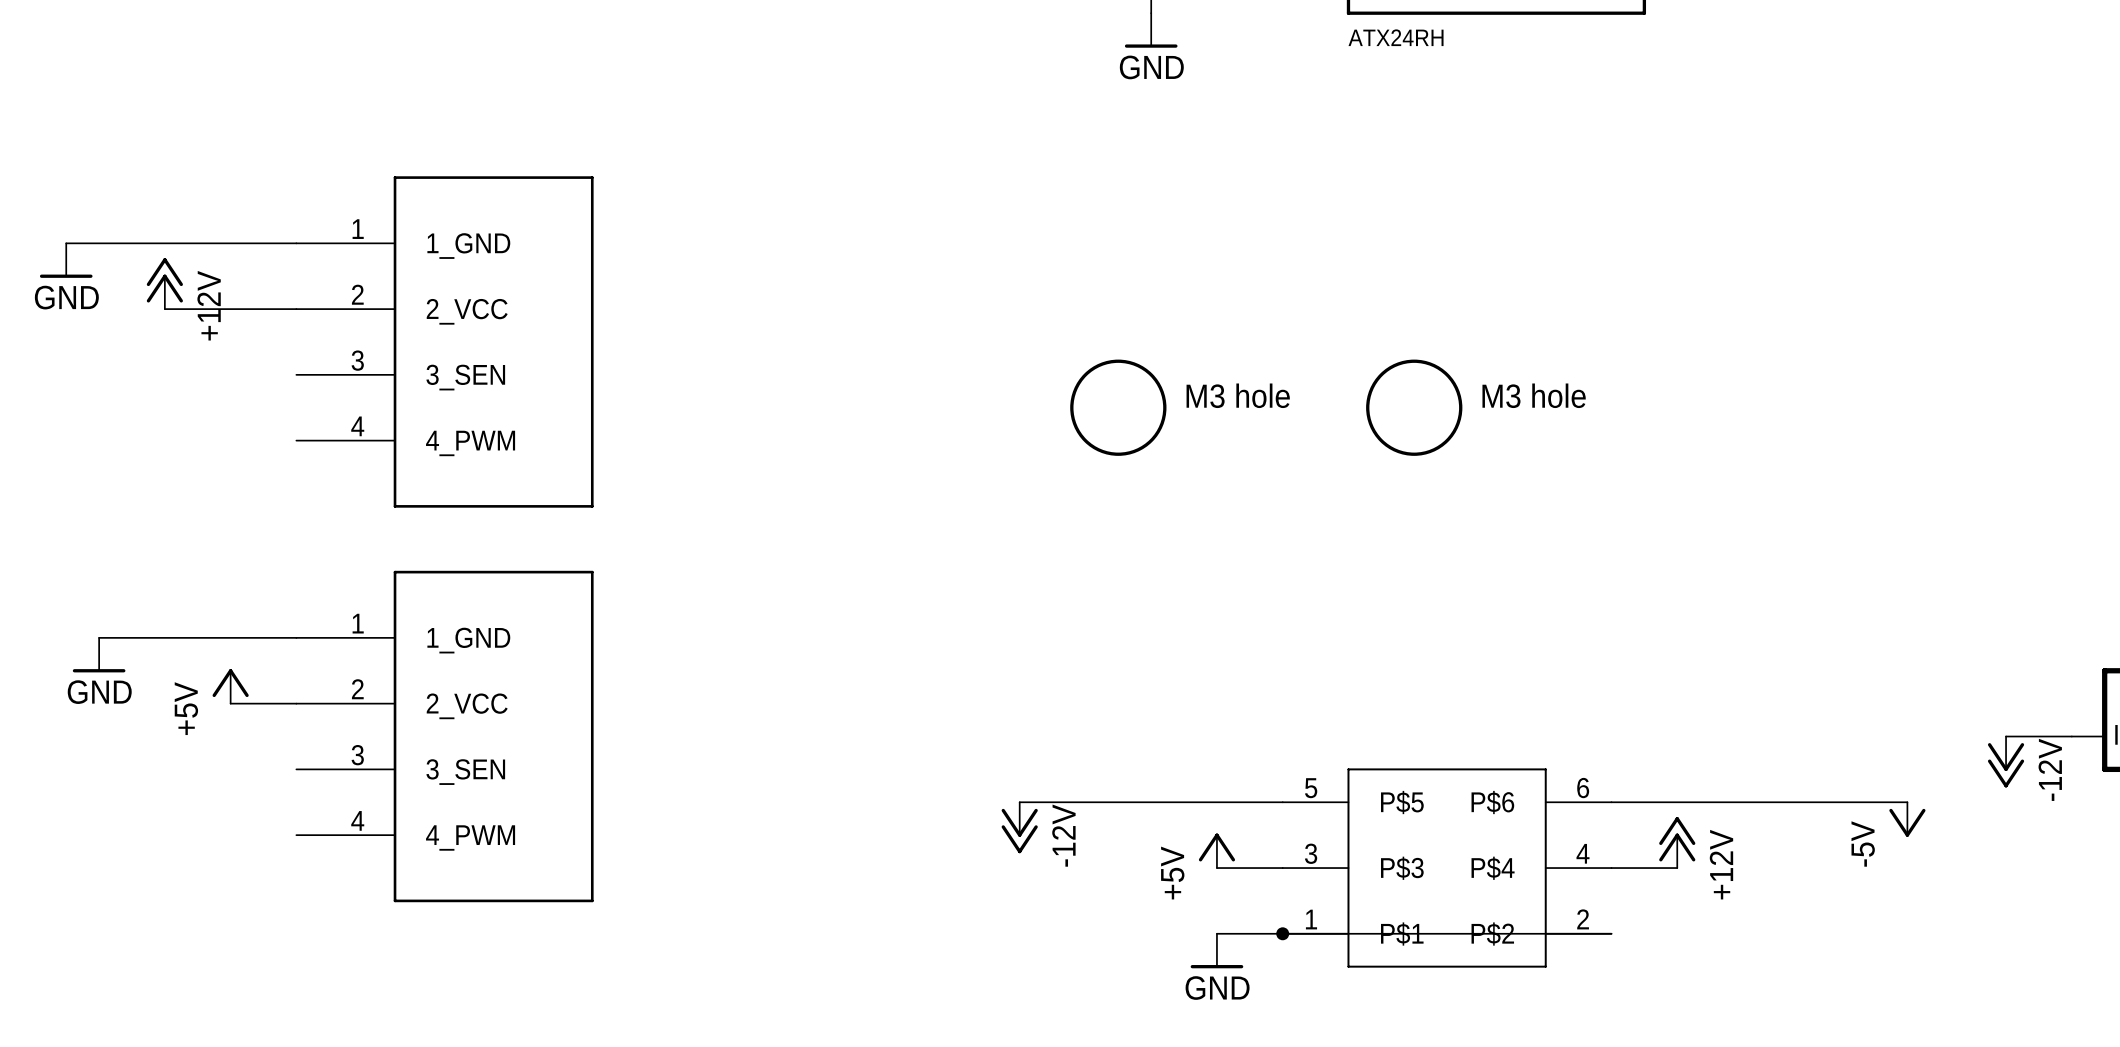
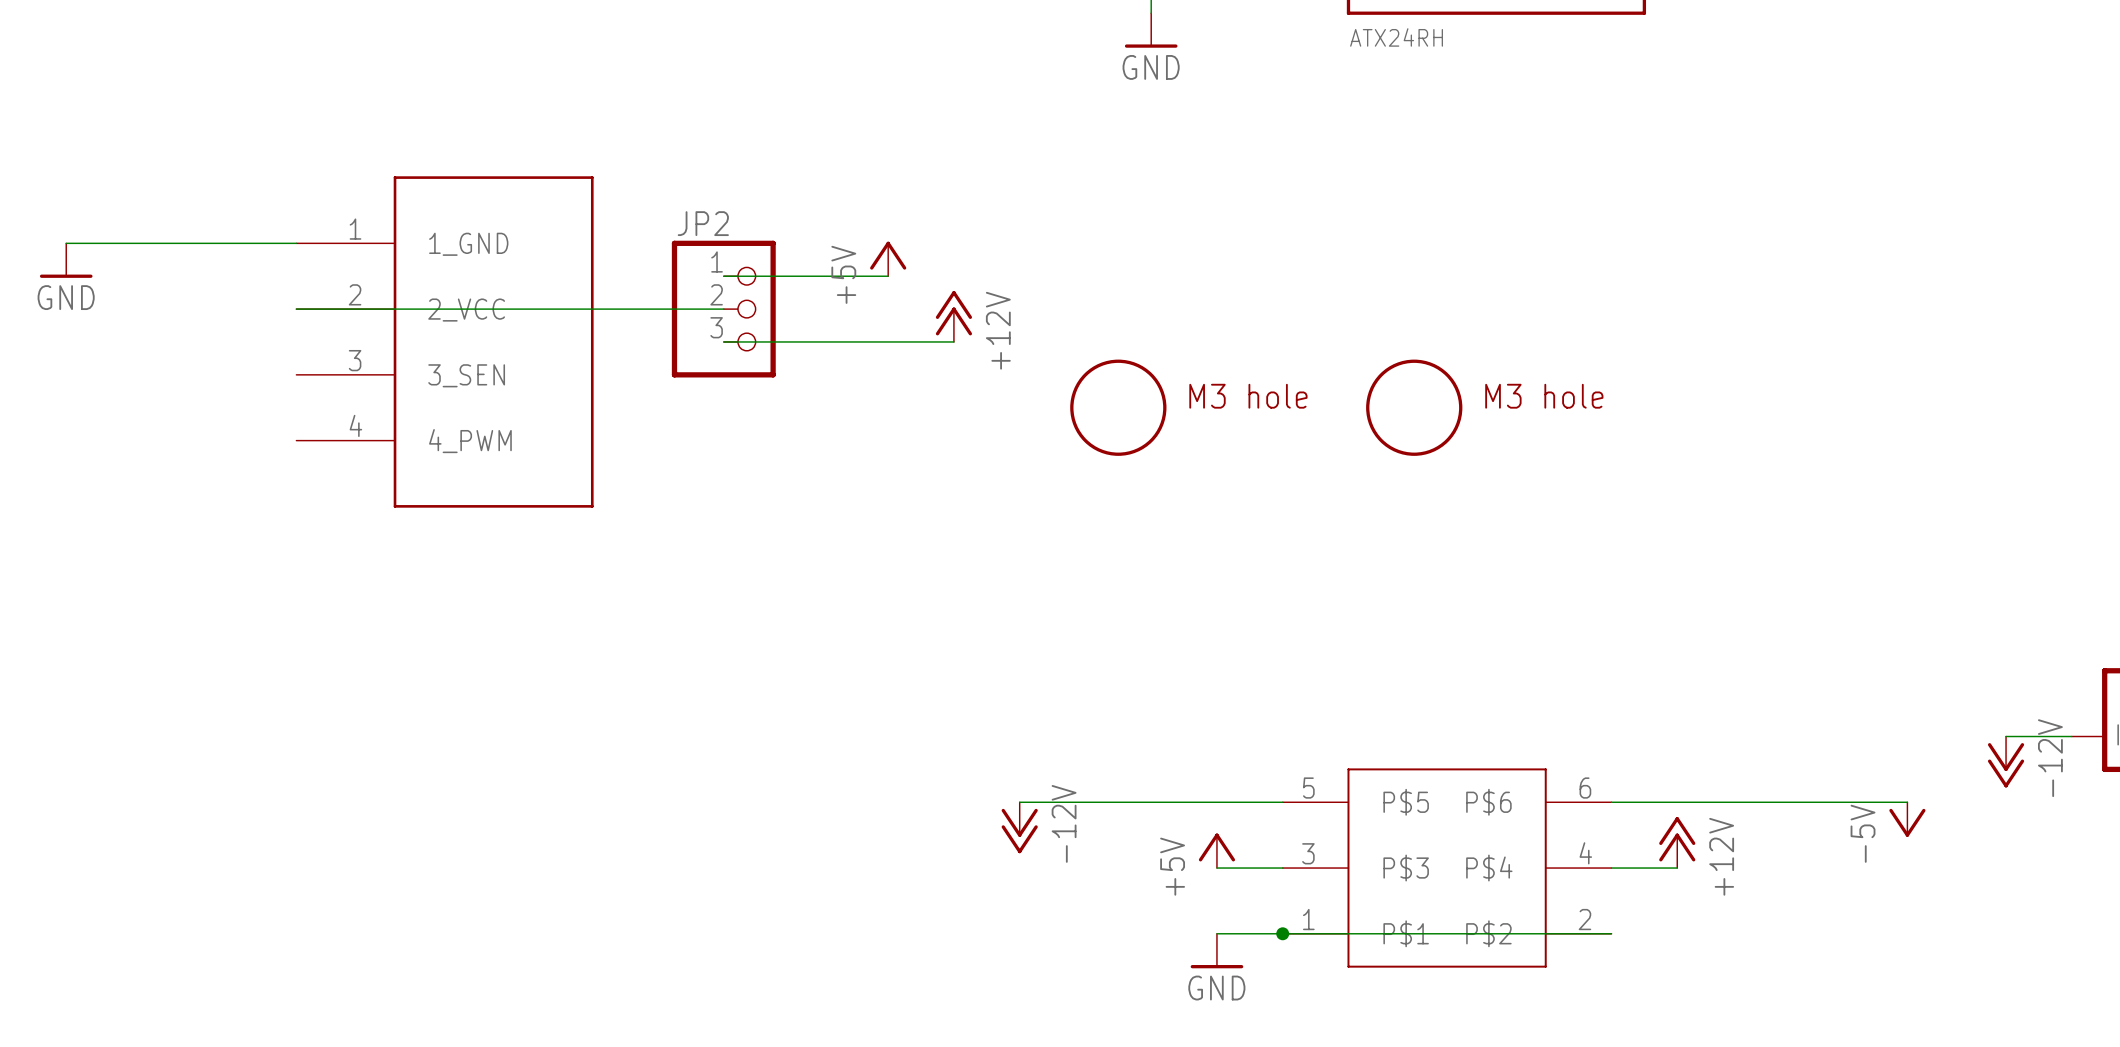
power symbol: none -> +5V (888, 258)
wire: none -> (723, 276) (888, 276)
power symbol: +12V (164, 283) -> none
wire: (164, 309) (296, 309) -> (723, 309) (296, 309)
JP2: none -> (723, 309)
power symbol: none -> +12V (953, 316)
wire: none -> (723, 341) (953, 341)
wire: (99, 637) (296, 637) -> none
power symbol: GND (99, 655) -> none
power symbol: +5V (230, 686) -> none
wire: (230, 703) (296, 703) -> none
part: (444, 736) -> none

